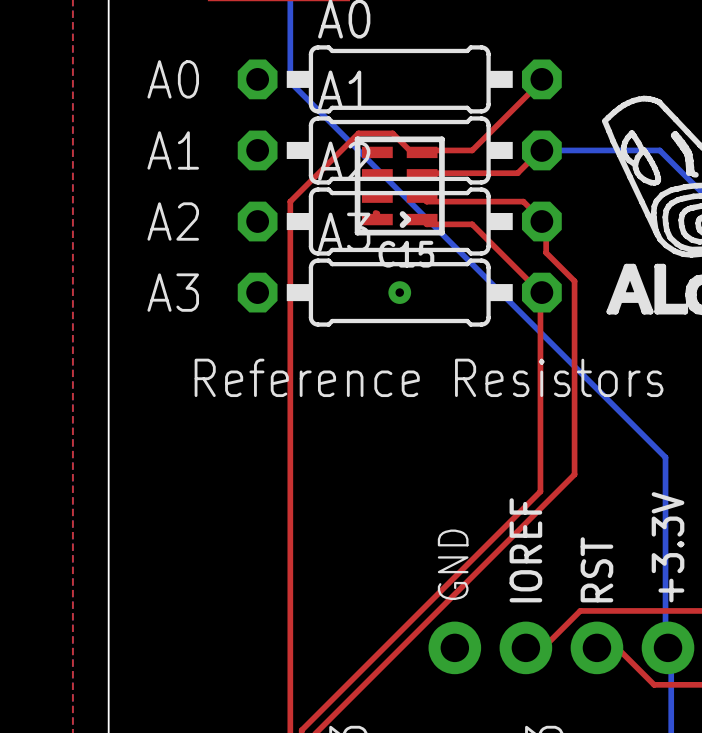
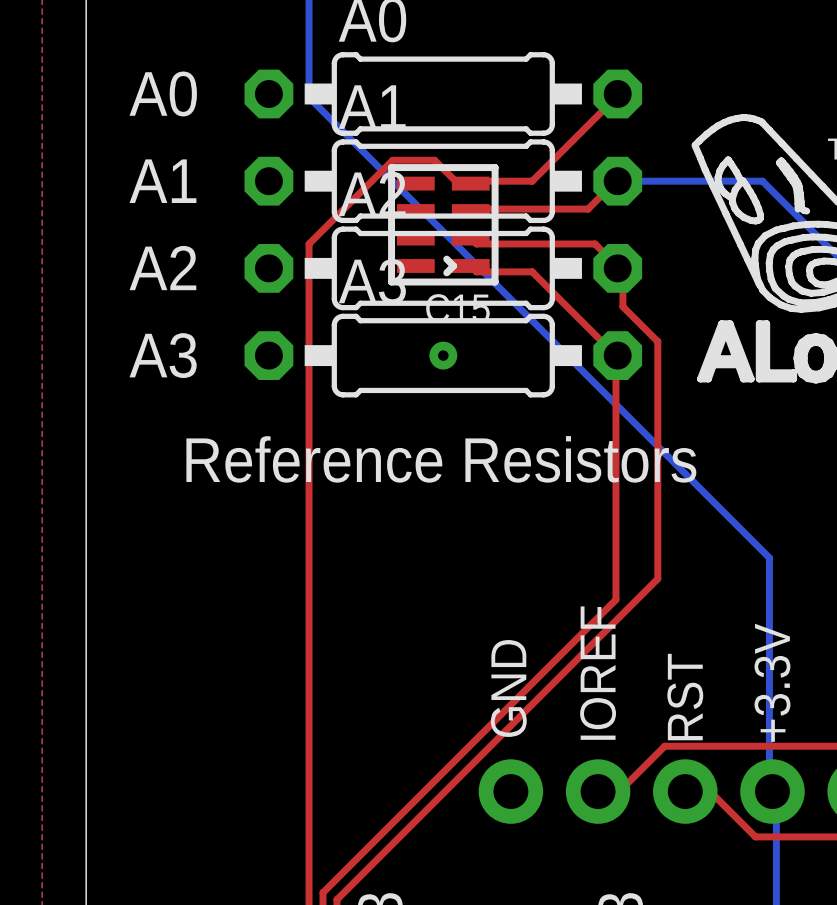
top track: (375, 212) (377, 213) -> none

